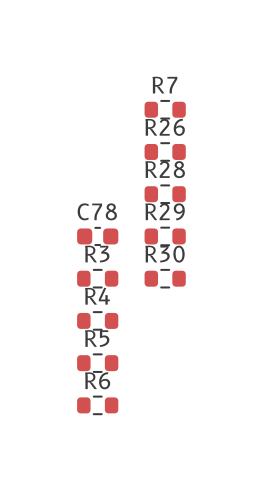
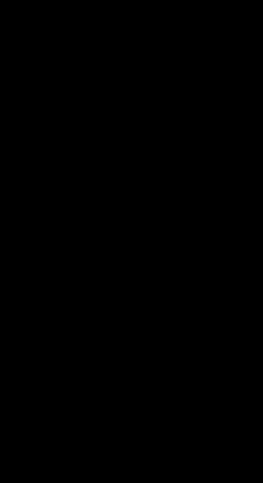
R7: (165, 109) -> none
R26: (165, 151) -> none
R28: (165, 194) -> none
C78: (97, 236) -> none
R29: (165, 236) -> none
R3: (97, 278) -> none
R30: (165, 278) -> none
R4: (97, 320) -> none
R5: (97, 363) -> none
R6: (97, 405) -> none

